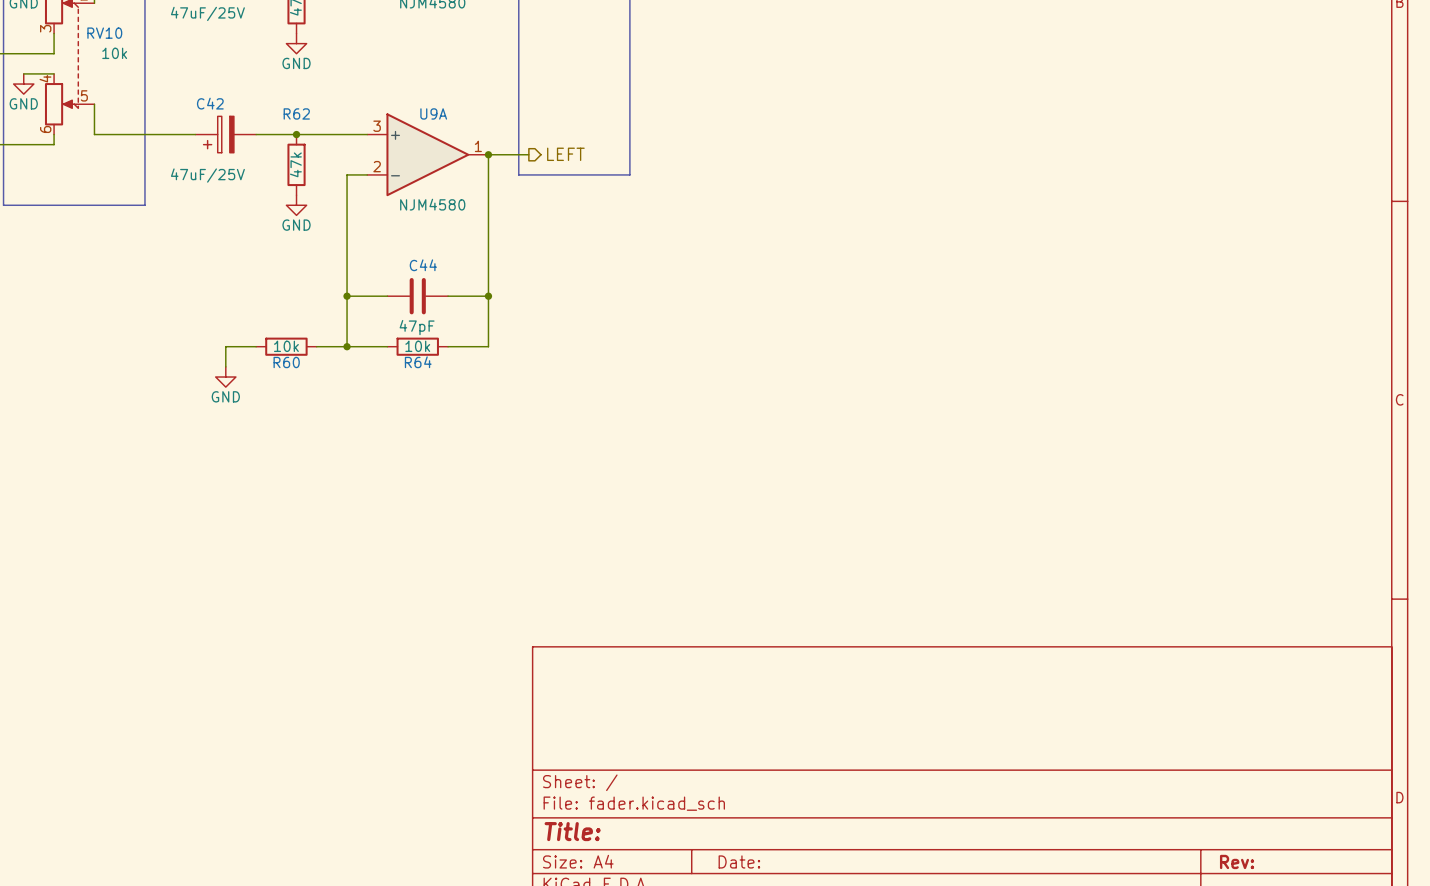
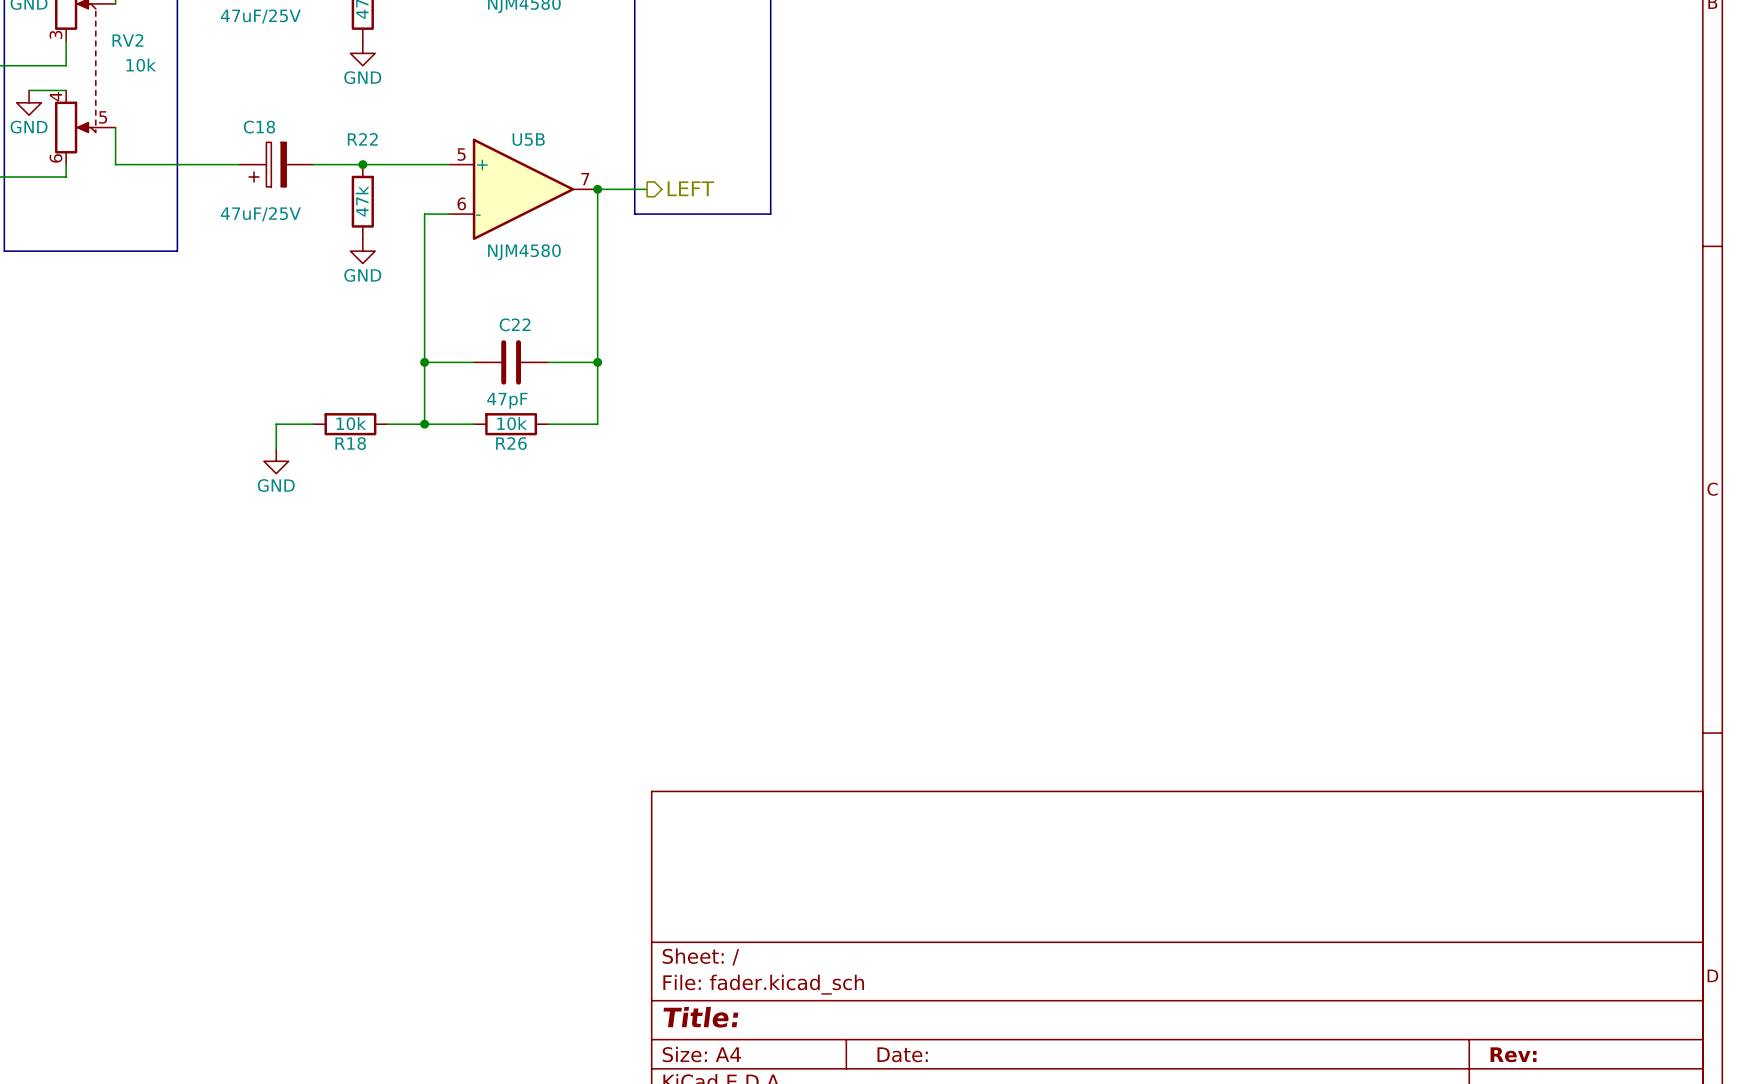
RV10 name: RV10 (104, 33) -> RV2 (127, 40)
C42 name: C42 (210, 103) -> C18 (259, 127)
R62 name: R62 (296, 113) -> R22 (362, 139)
U9A name: U9A (433, 113) -> U5B (528, 139)
U9A pin number: 3 (377, 126) -> 5 (461, 154)
U9A pin number: 1 (478, 146) -> 7 (585, 179)
U9A pin number: 2 (377, 166) -> 6 (461, 203)
C44 name: C44 (423, 265) -> C22 (515, 324)
R60 name: R60 (286, 362) -> R18 (350, 443)
R64 name: R64 (418, 362) -> R26 (511, 443)

